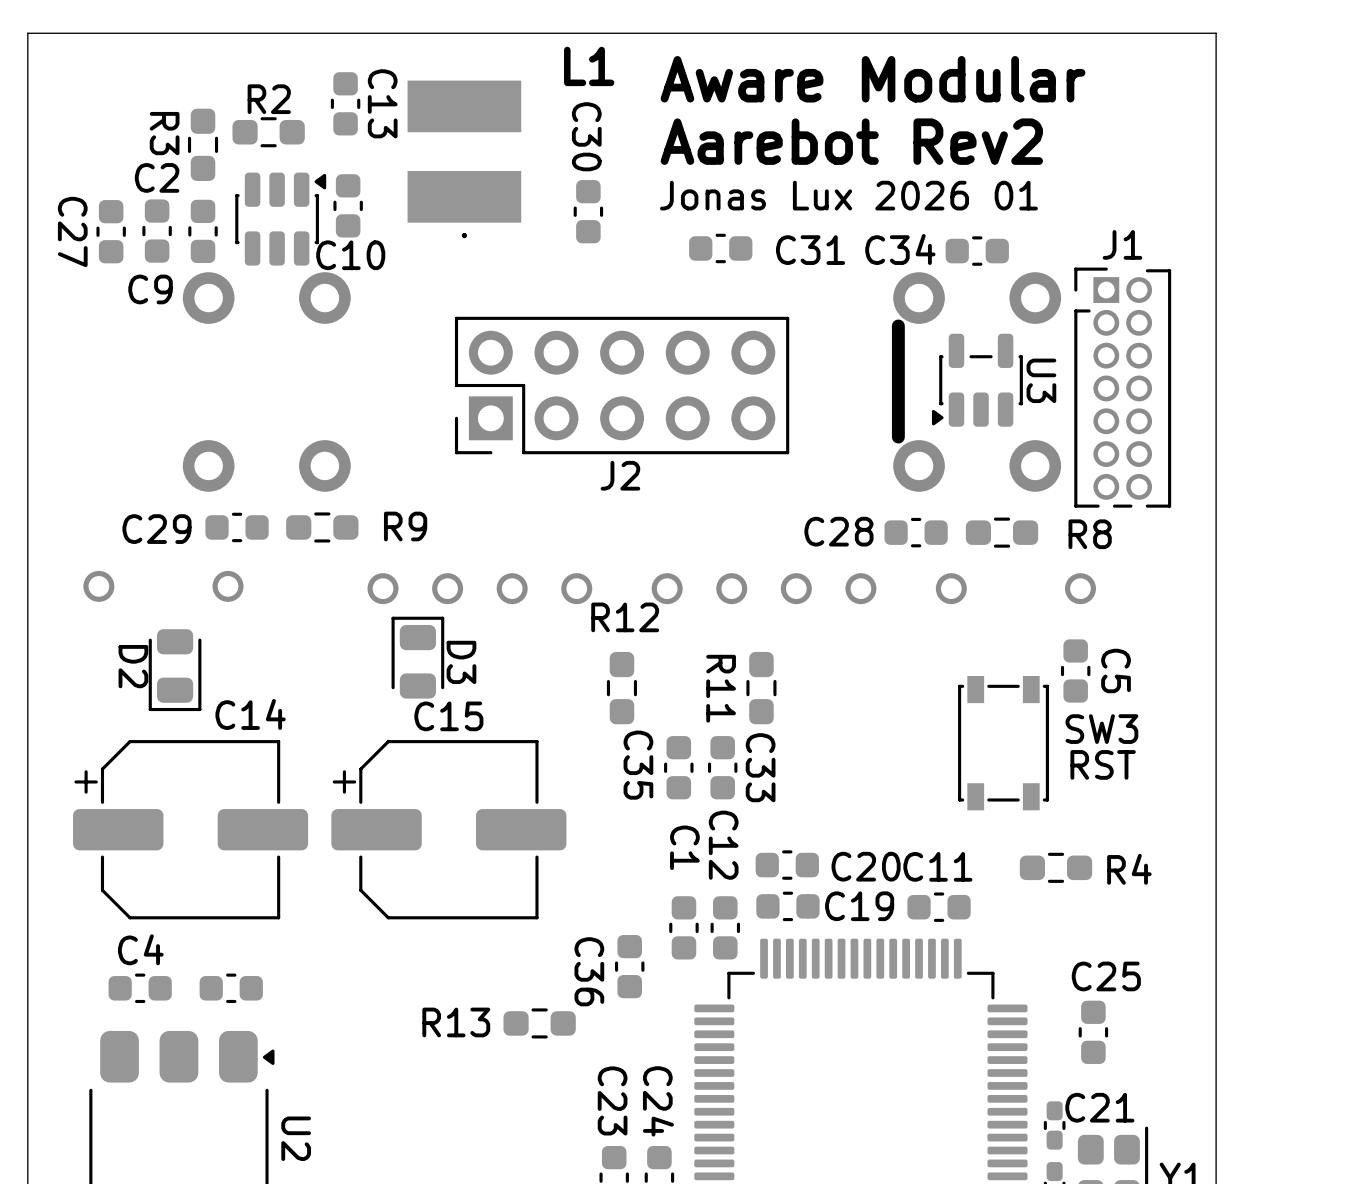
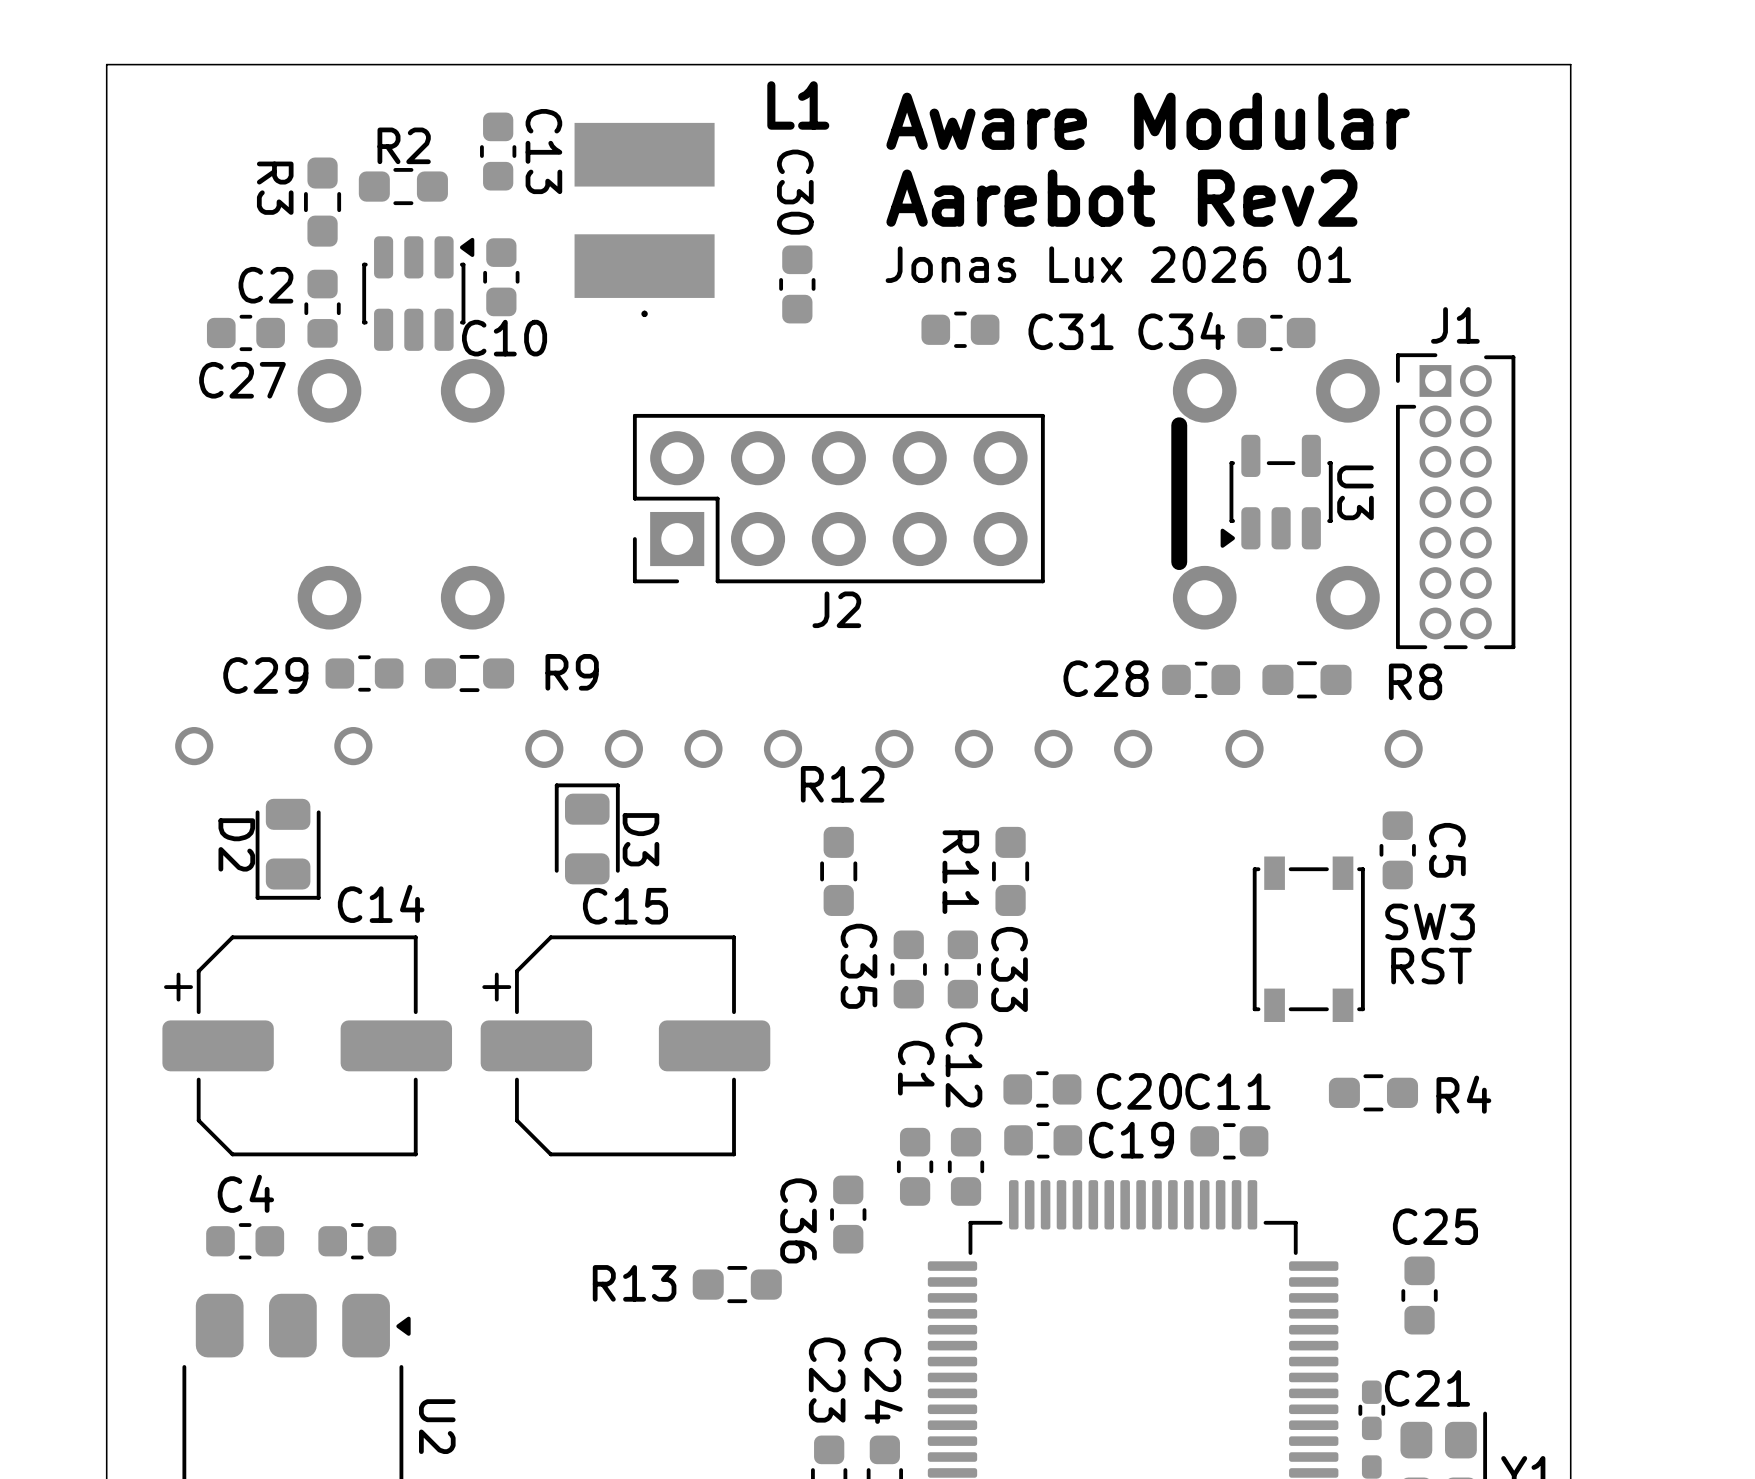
C2 name position: C2 (157, 177) -> C2 (265, 285)
C27 name position: C27 (72, 231) -> C27 (242, 380)
C27 rotation: 0° (111, 231) -> 90° clockwise (245, 332)
C9: (157, 231) -> none

